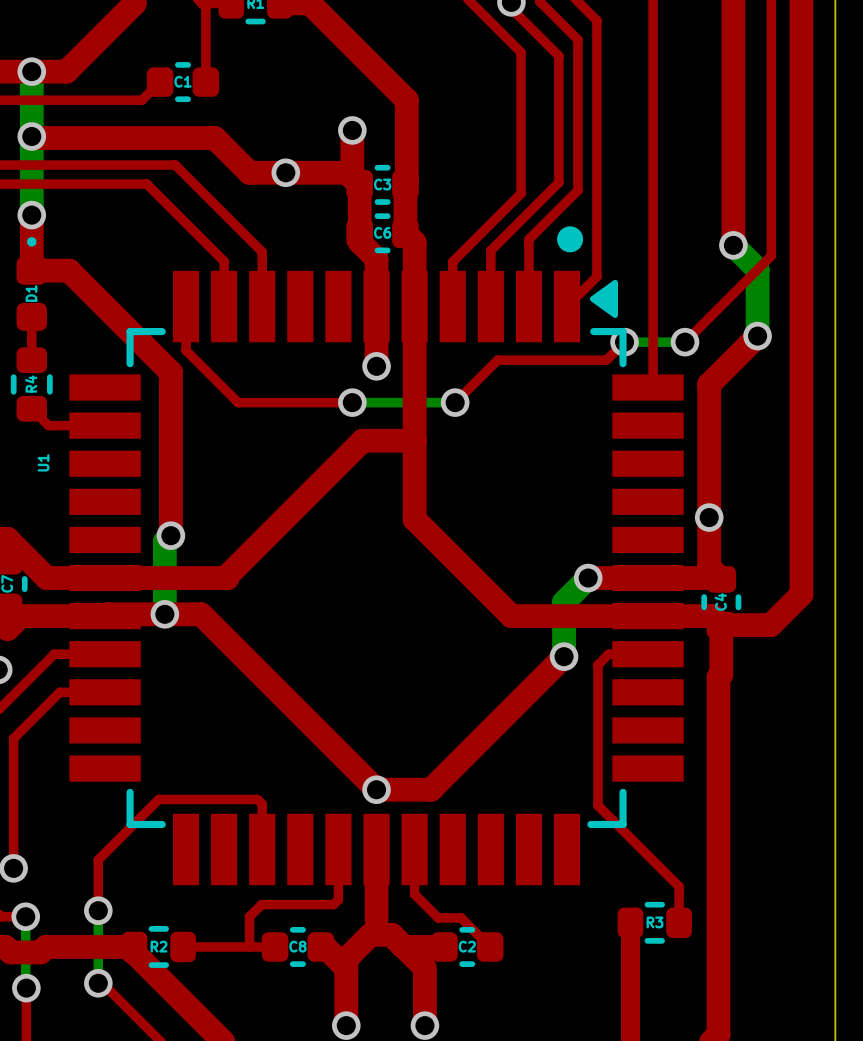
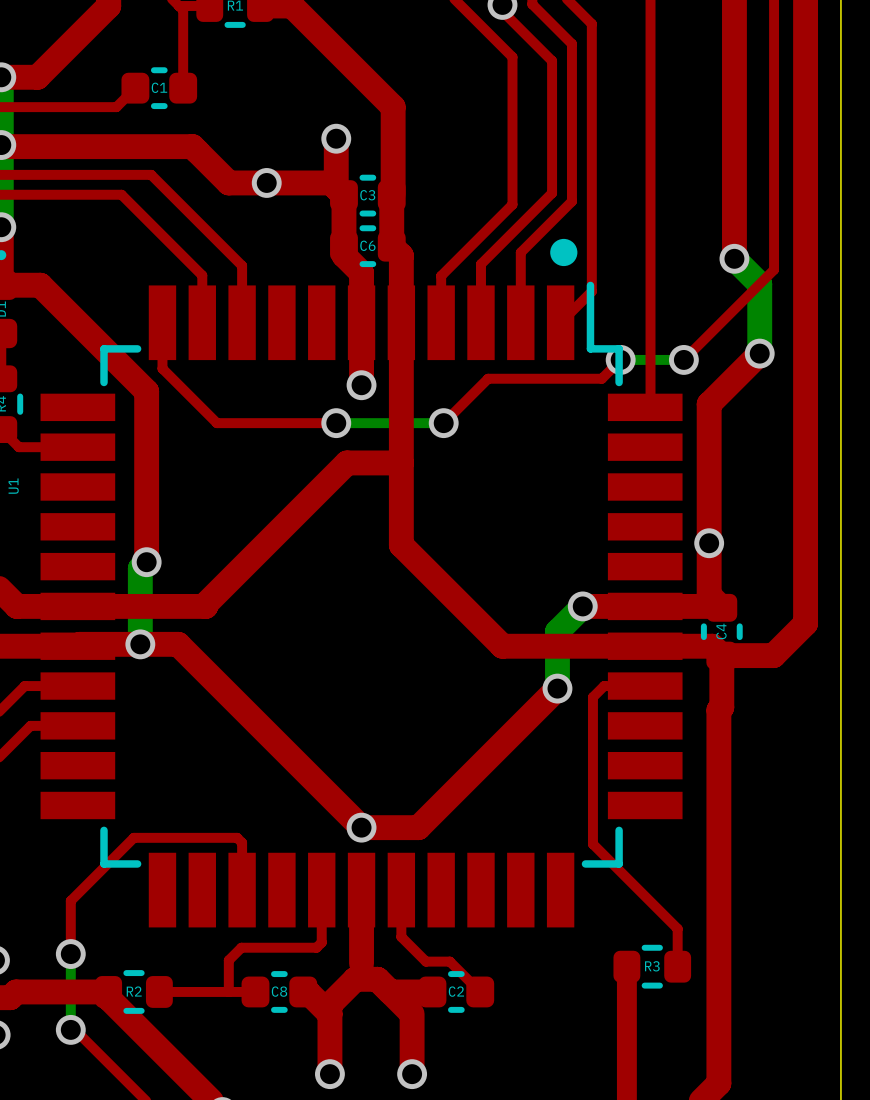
U1 footprint: [69, 270, 684, 886] -> [40, 281, 683, 928]

